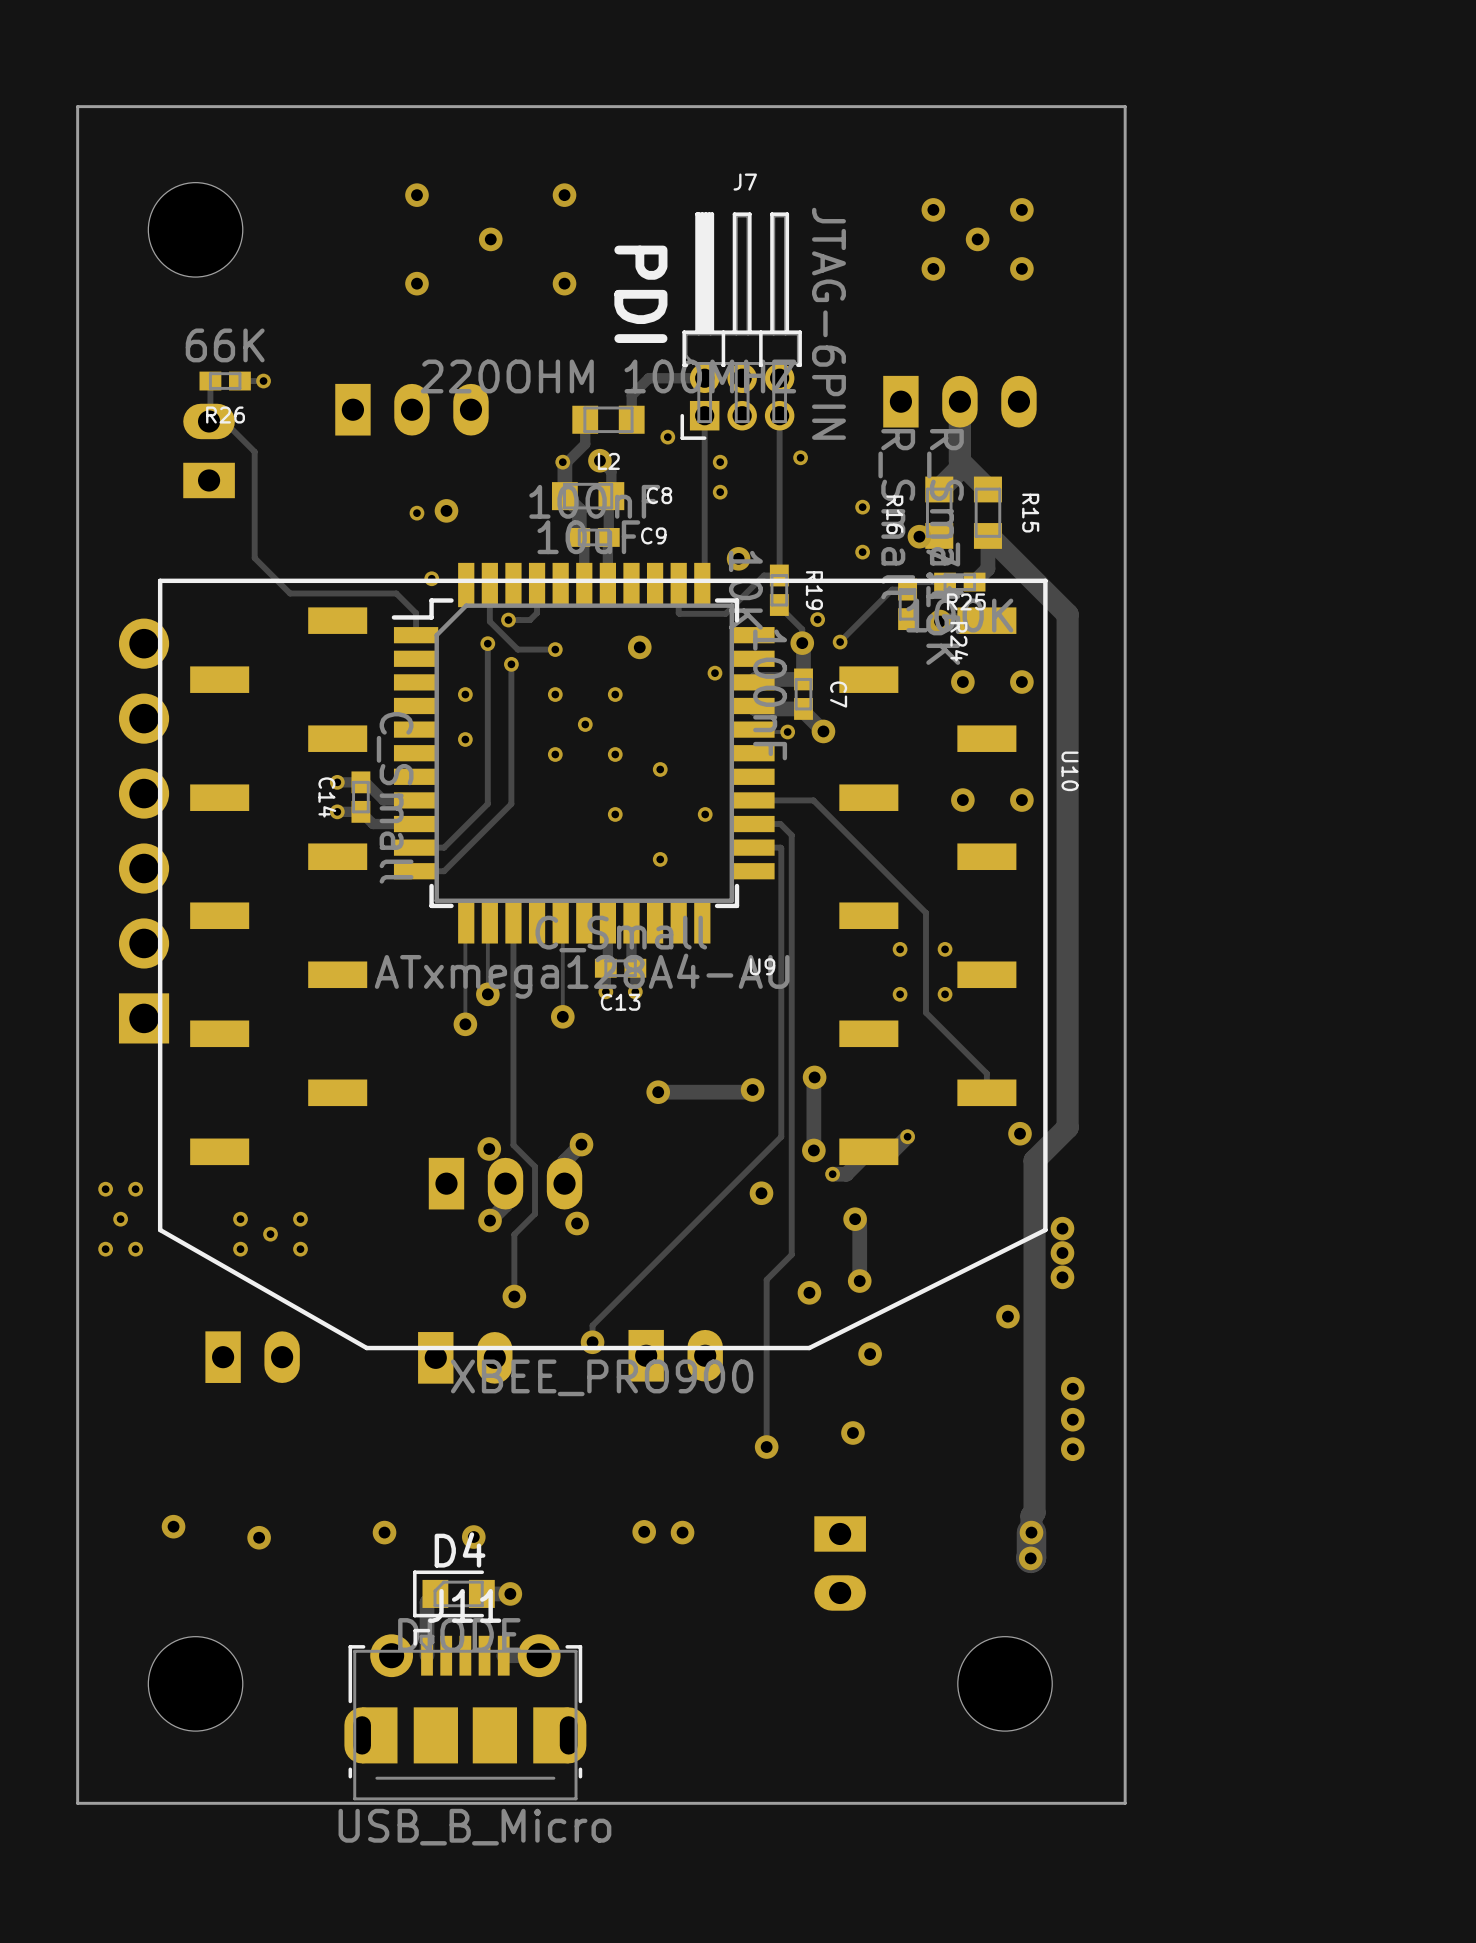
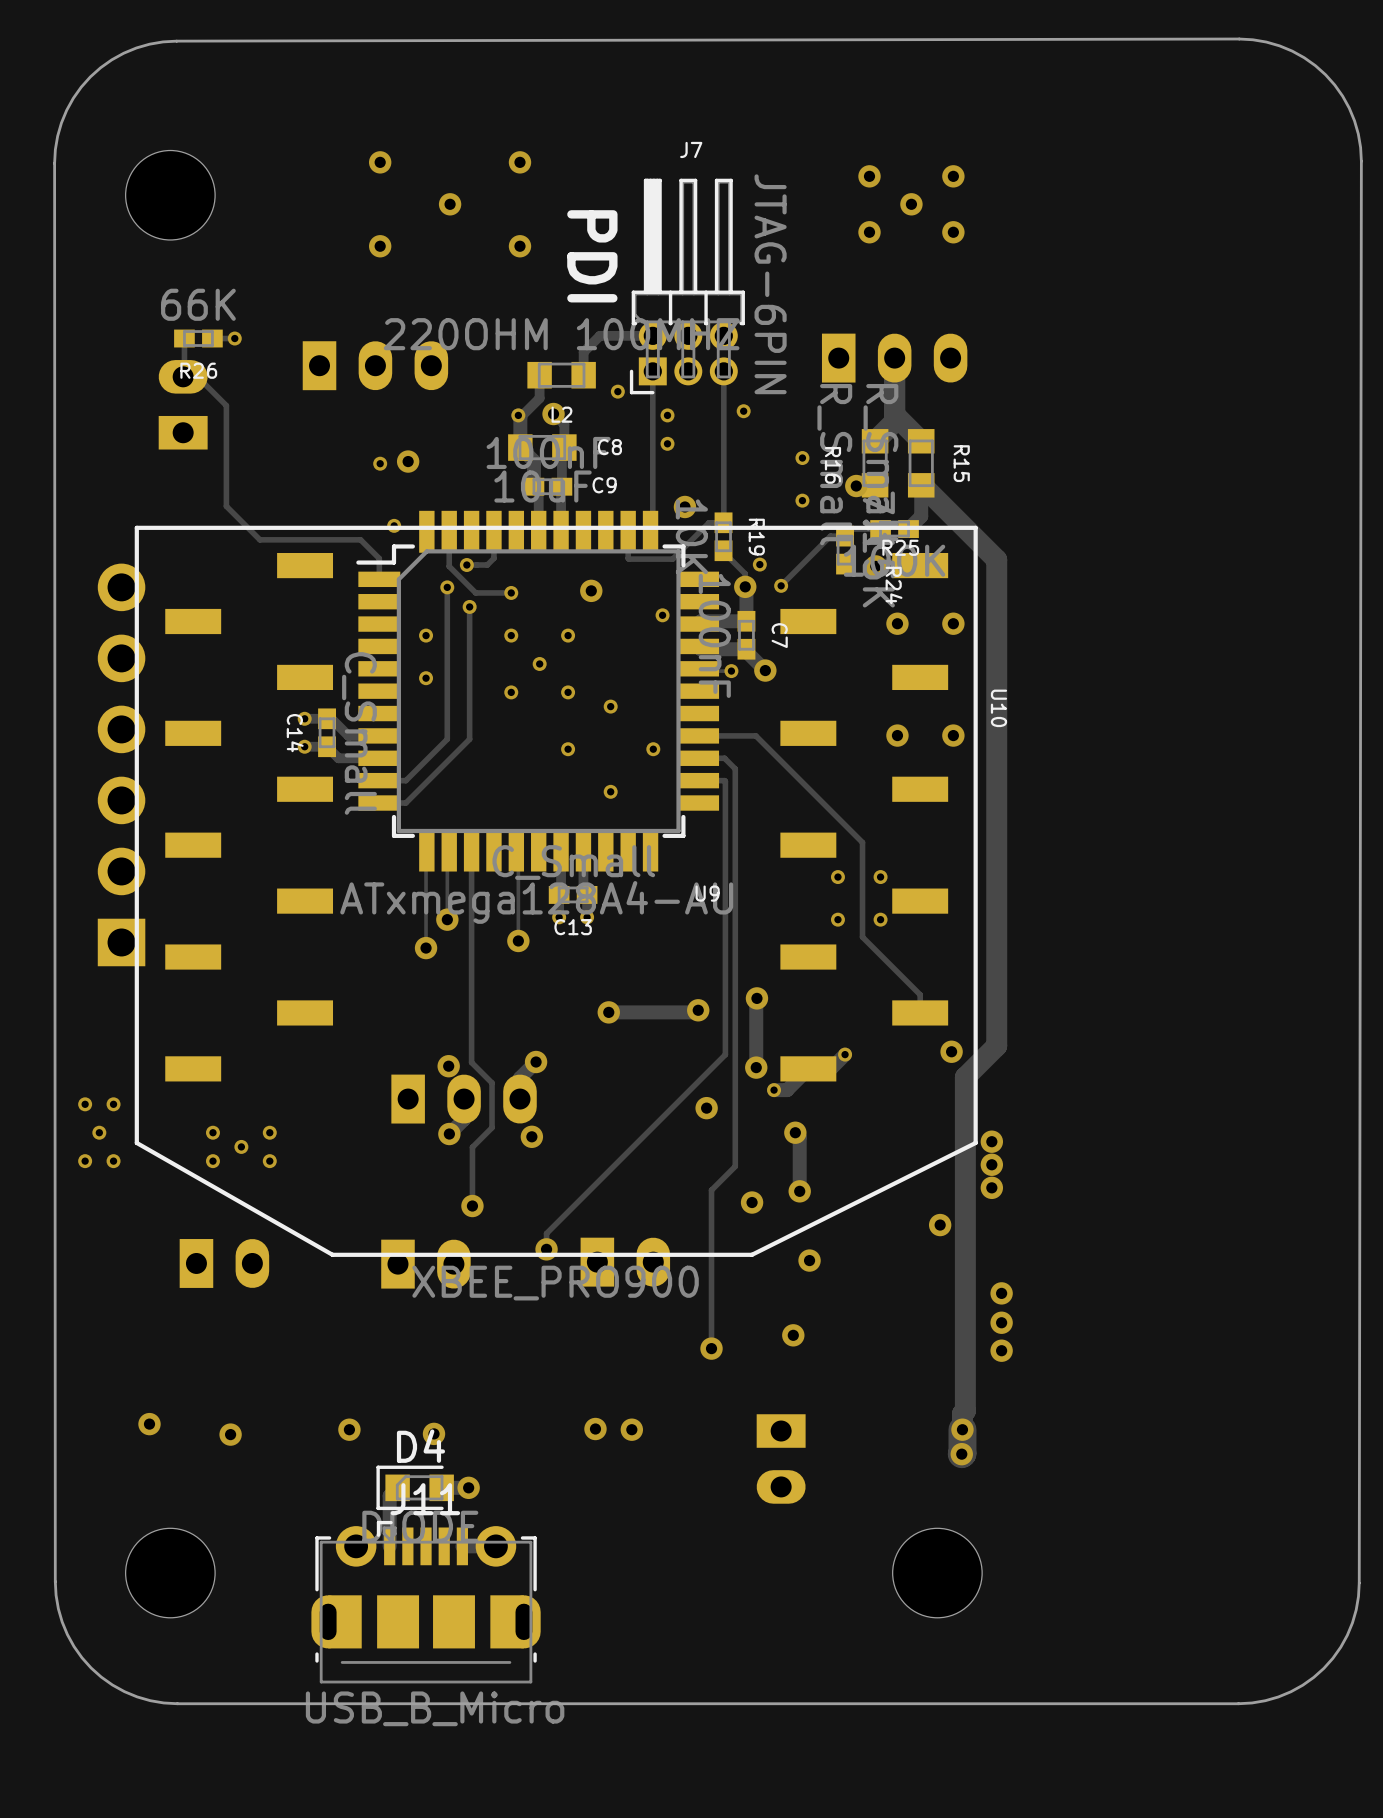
board edge: (1125, 106) (77, 106) (77, 1803) (1125, 1803) (1125, 106) -> (1239, 39) (1266, 42) (1292, 51) (1304, 57) (1325, 74) (1342, 96) (1349, 108) (1354, 120) (1360, 147) (1359, 1583) (1358, 1596) (1352, 1622) (1340, 1647) (1332, 1658) (1313, 1677) (1290, 1691) (1265, 1700) (1238, 1703) (177, 1703) (150, 1700) (124, 1691) (112, 1685) (91, 1667) (81, 1657) (67, 1634) (58, 1608) (55, 1581) (54, 163) (57, 136) (66, 110) (73, 98) (90, 76) (100, 67) (123, 53) (149, 44) (176, 41) (1239, 39)

